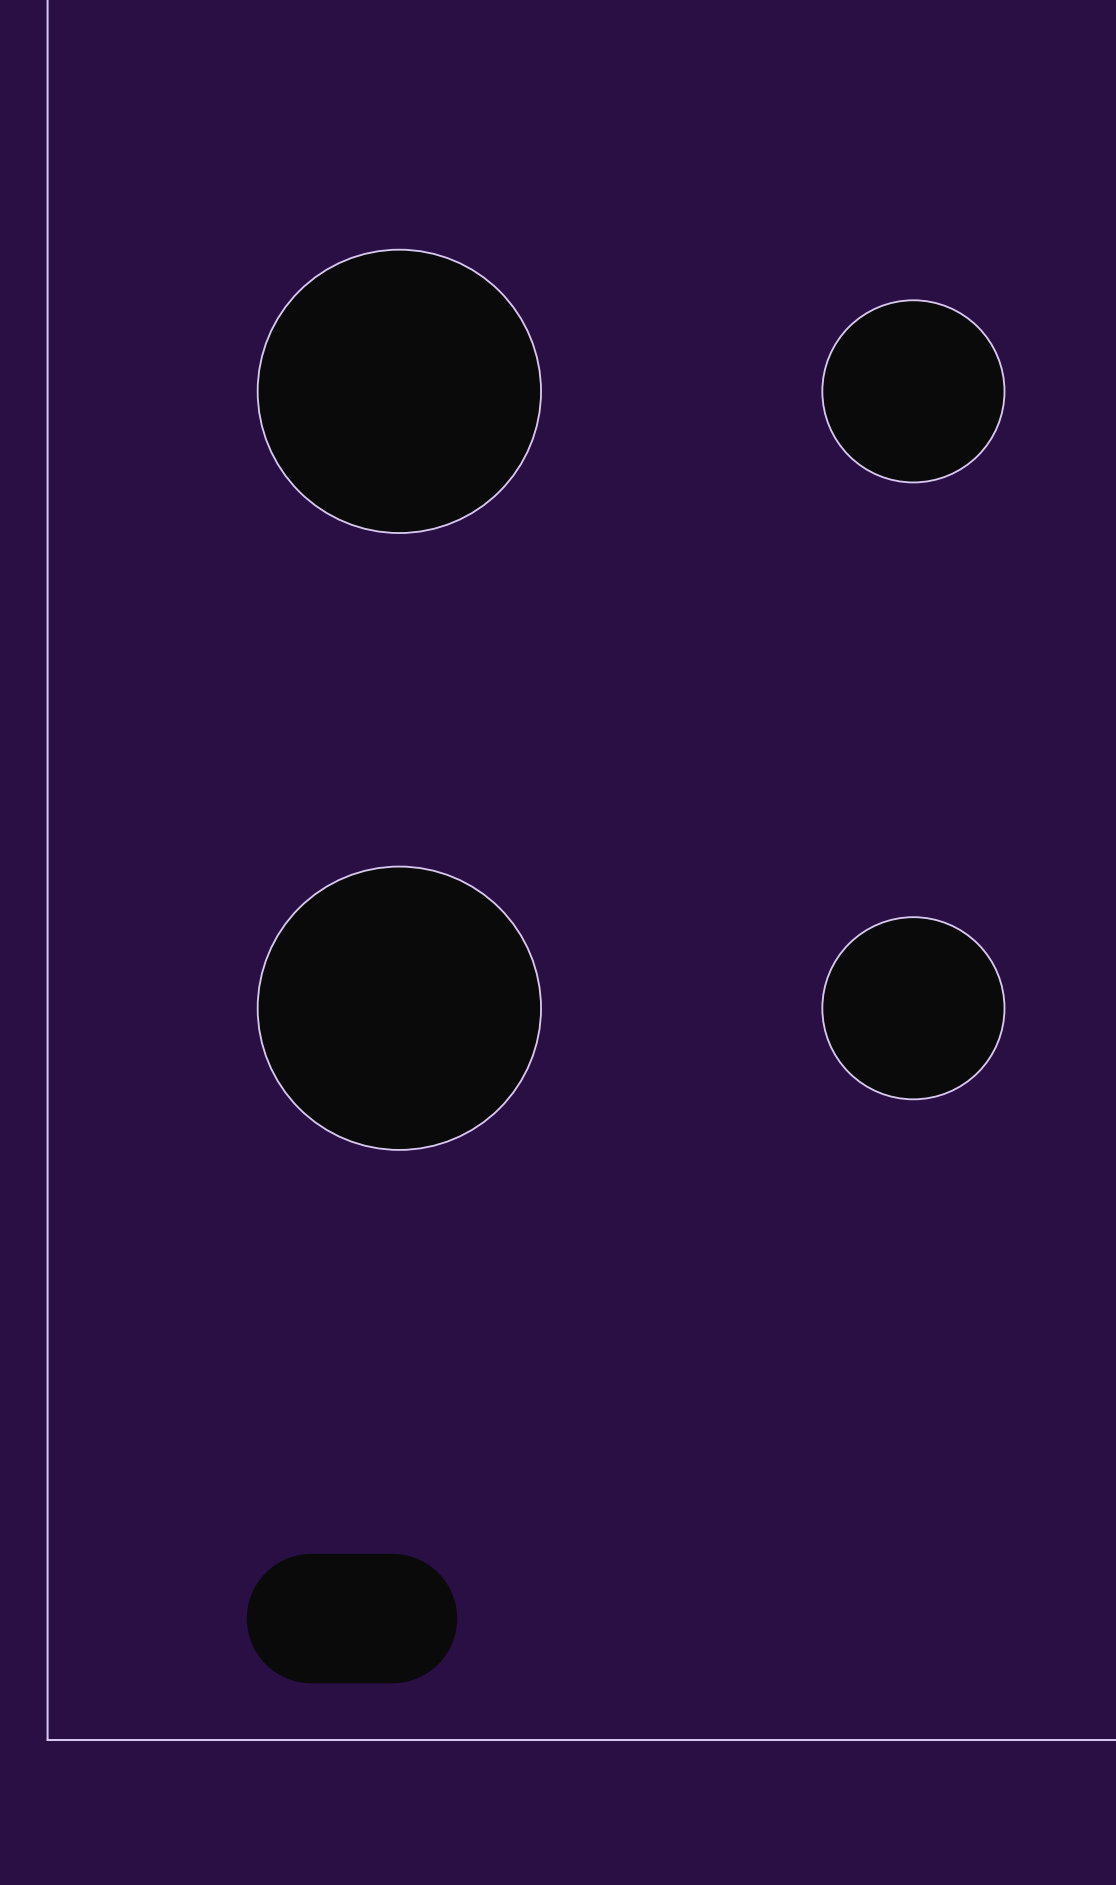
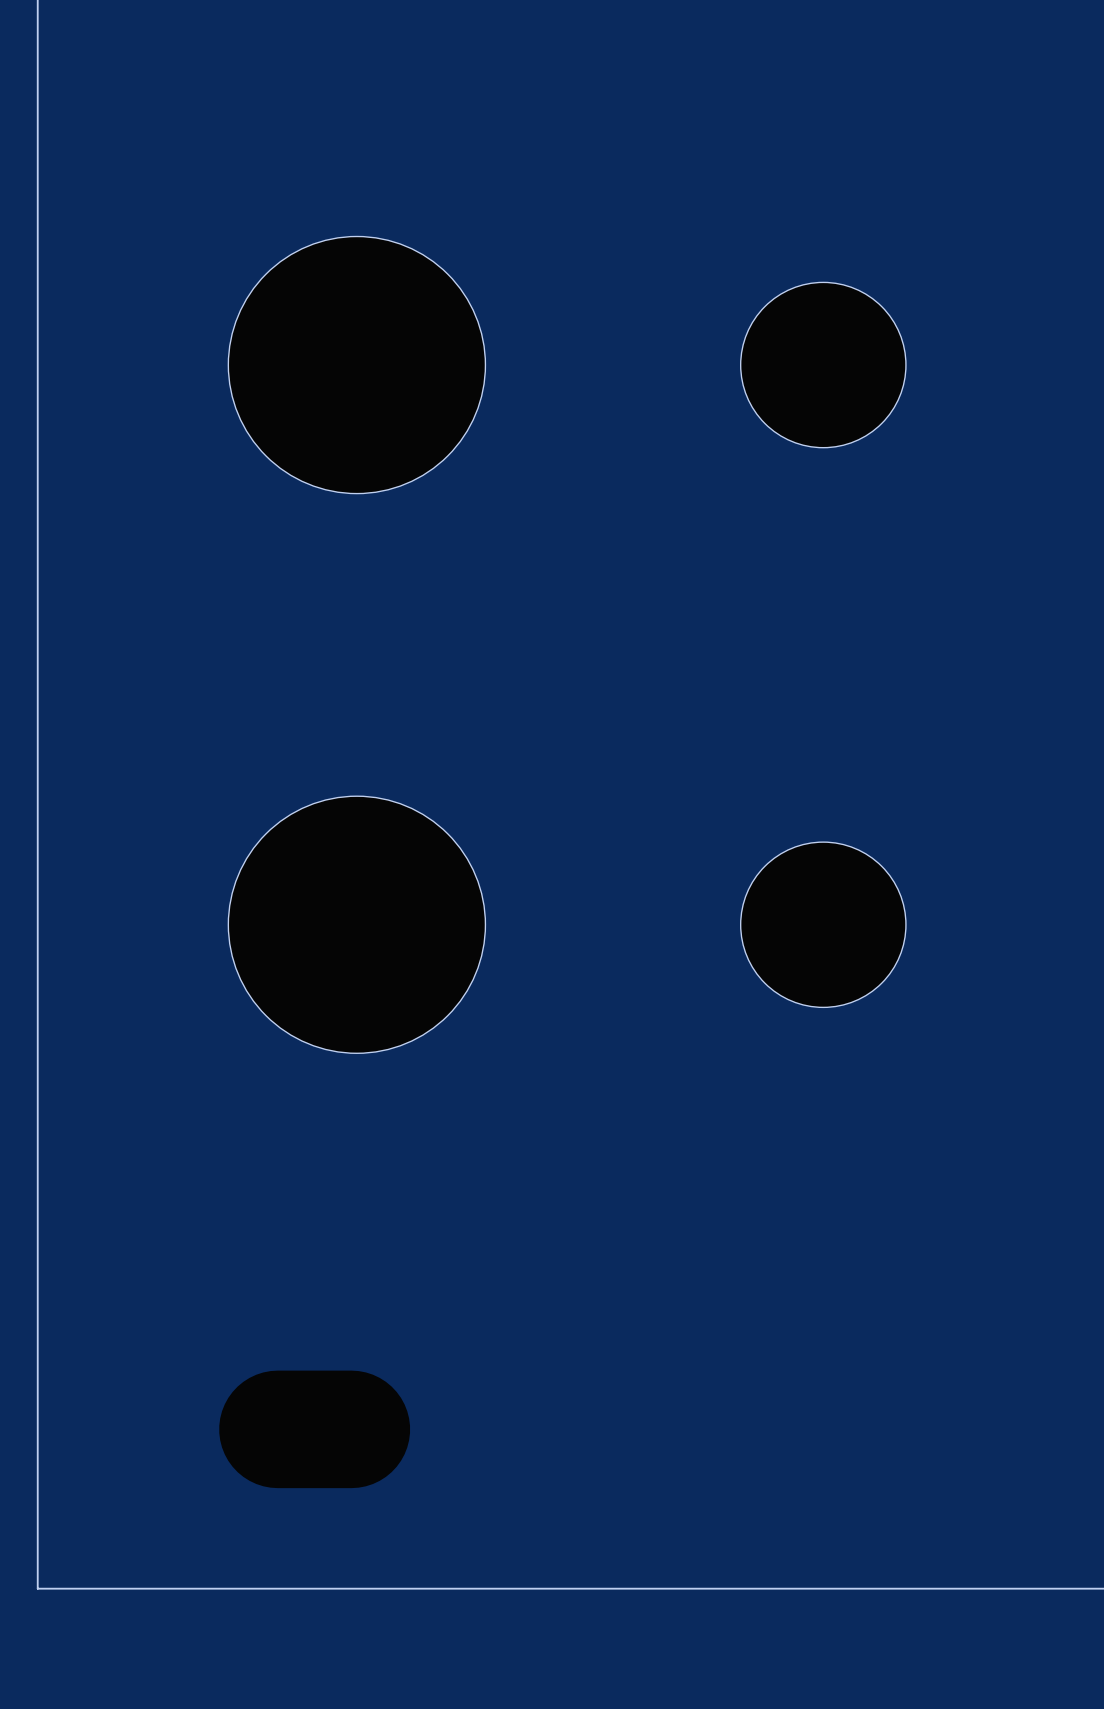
part position: (351, 1618) -> (314, 1429)

